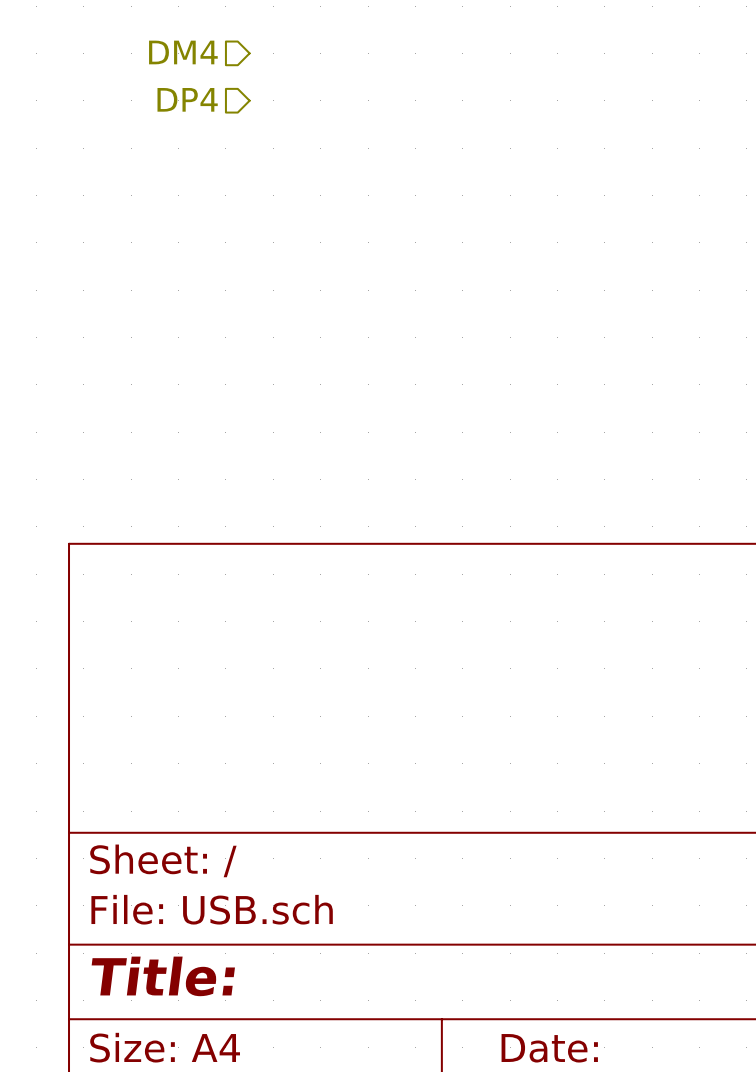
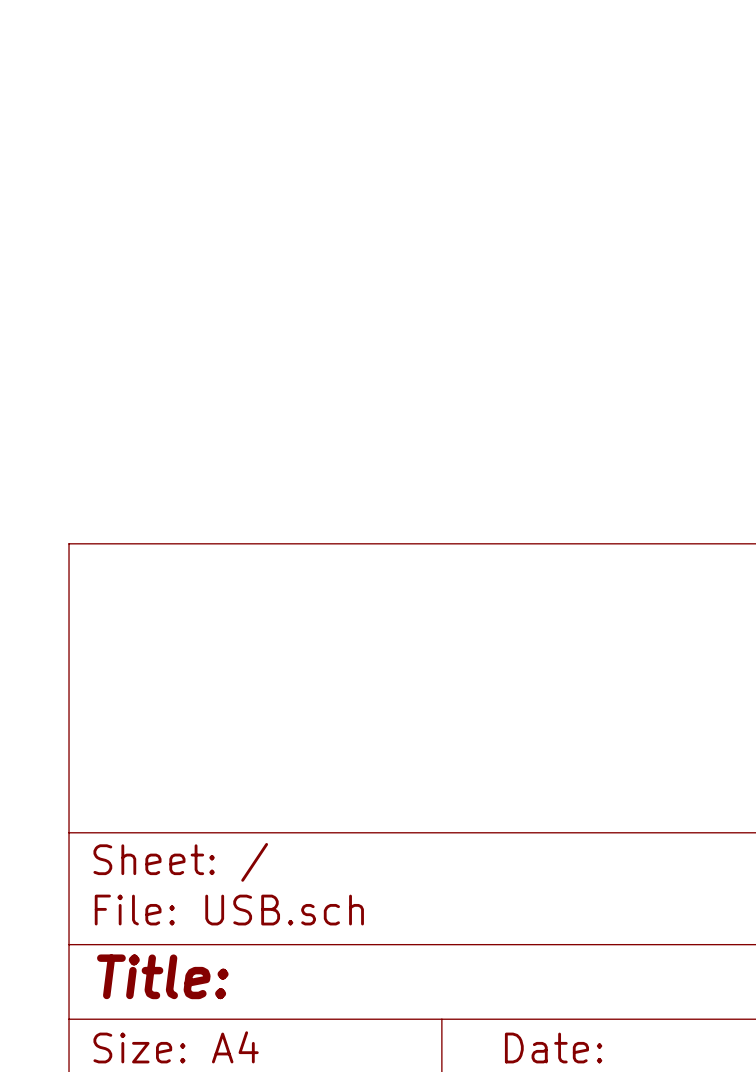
hierarchical label: DM4 (183, 52) -> none
hierarchical label: DP4 (187, 99) -> none

